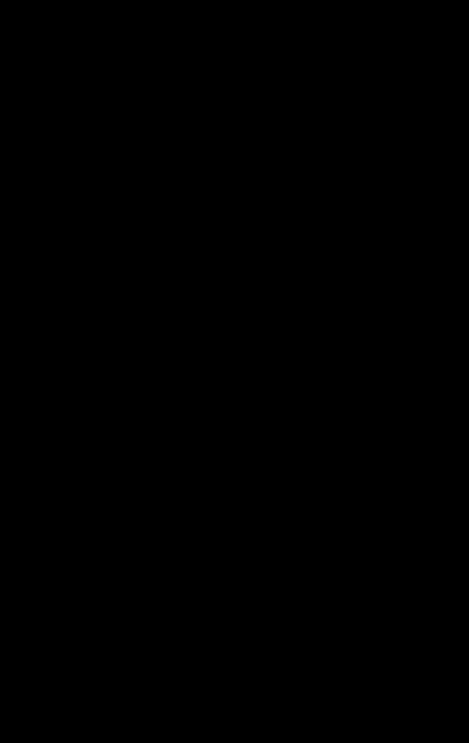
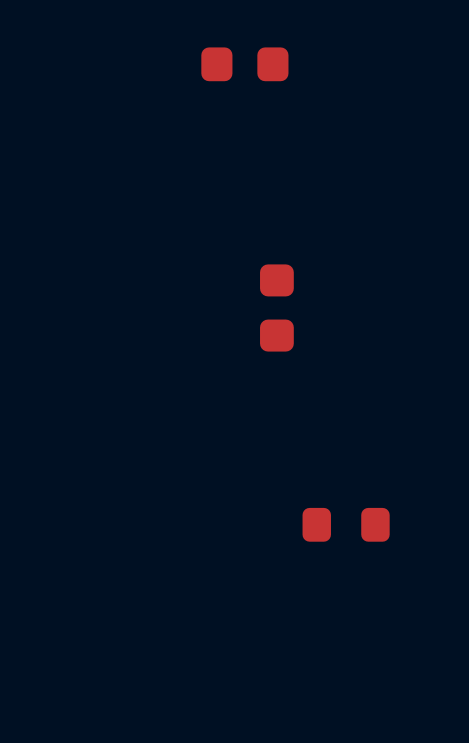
part: none -> (244, 64)
part: none -> (276, 307)
part: none -> (346, 524)

